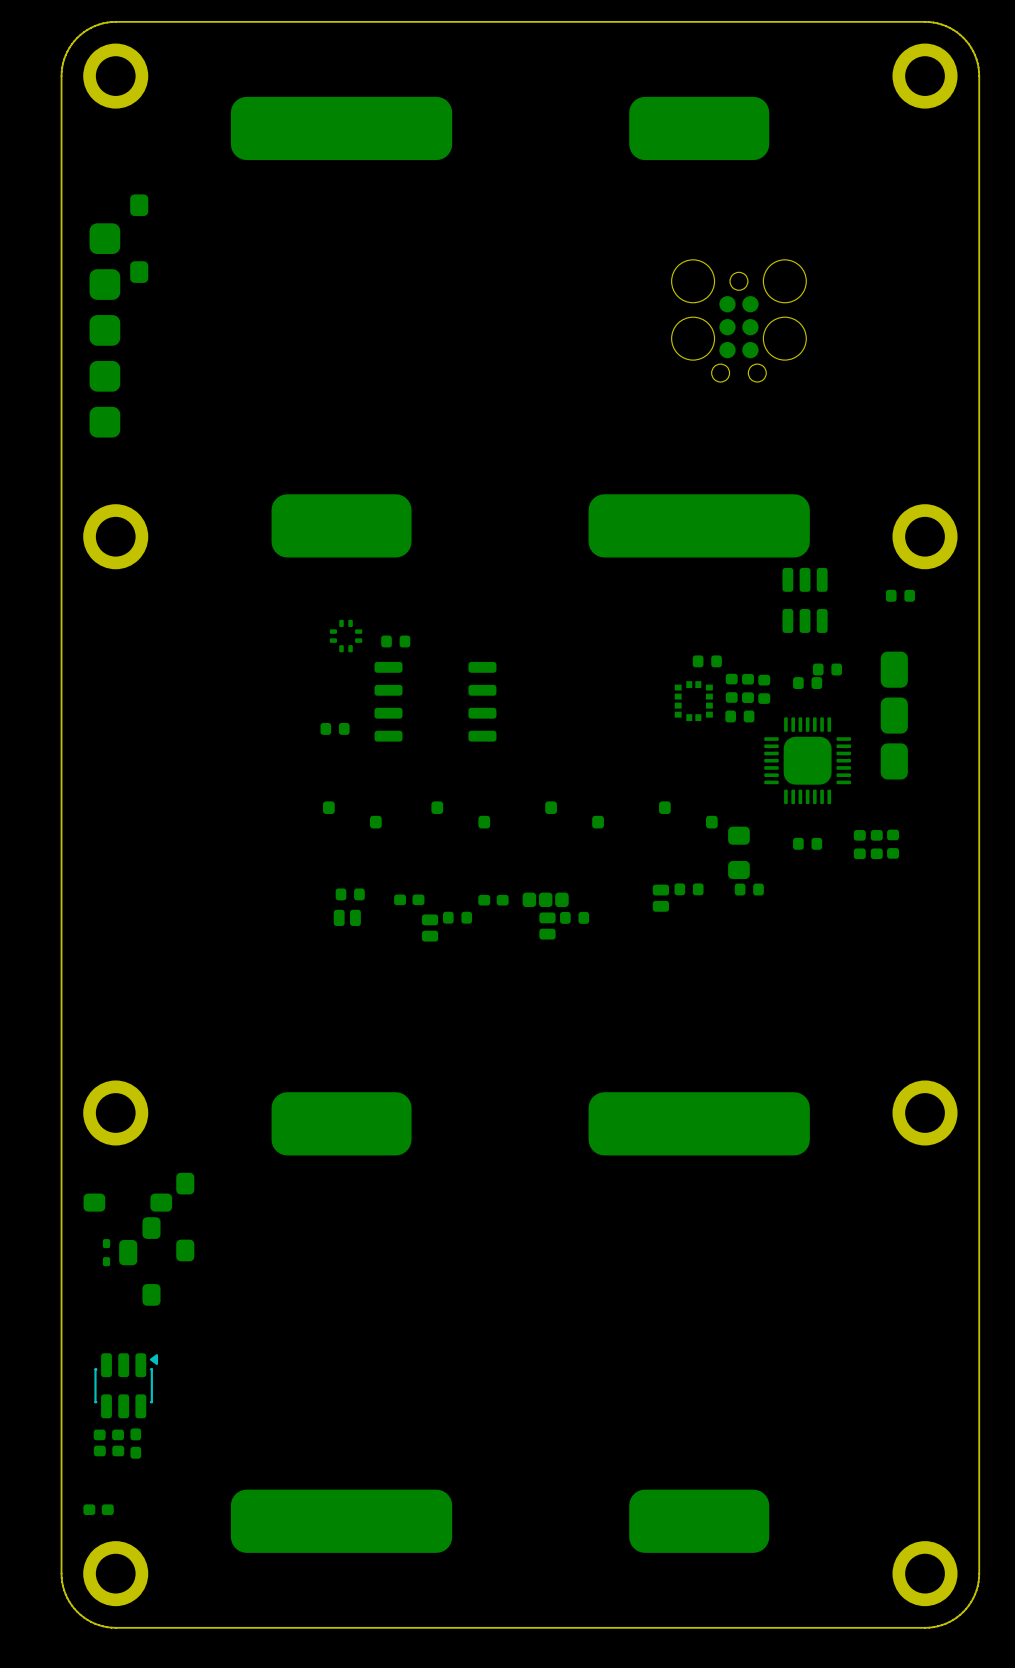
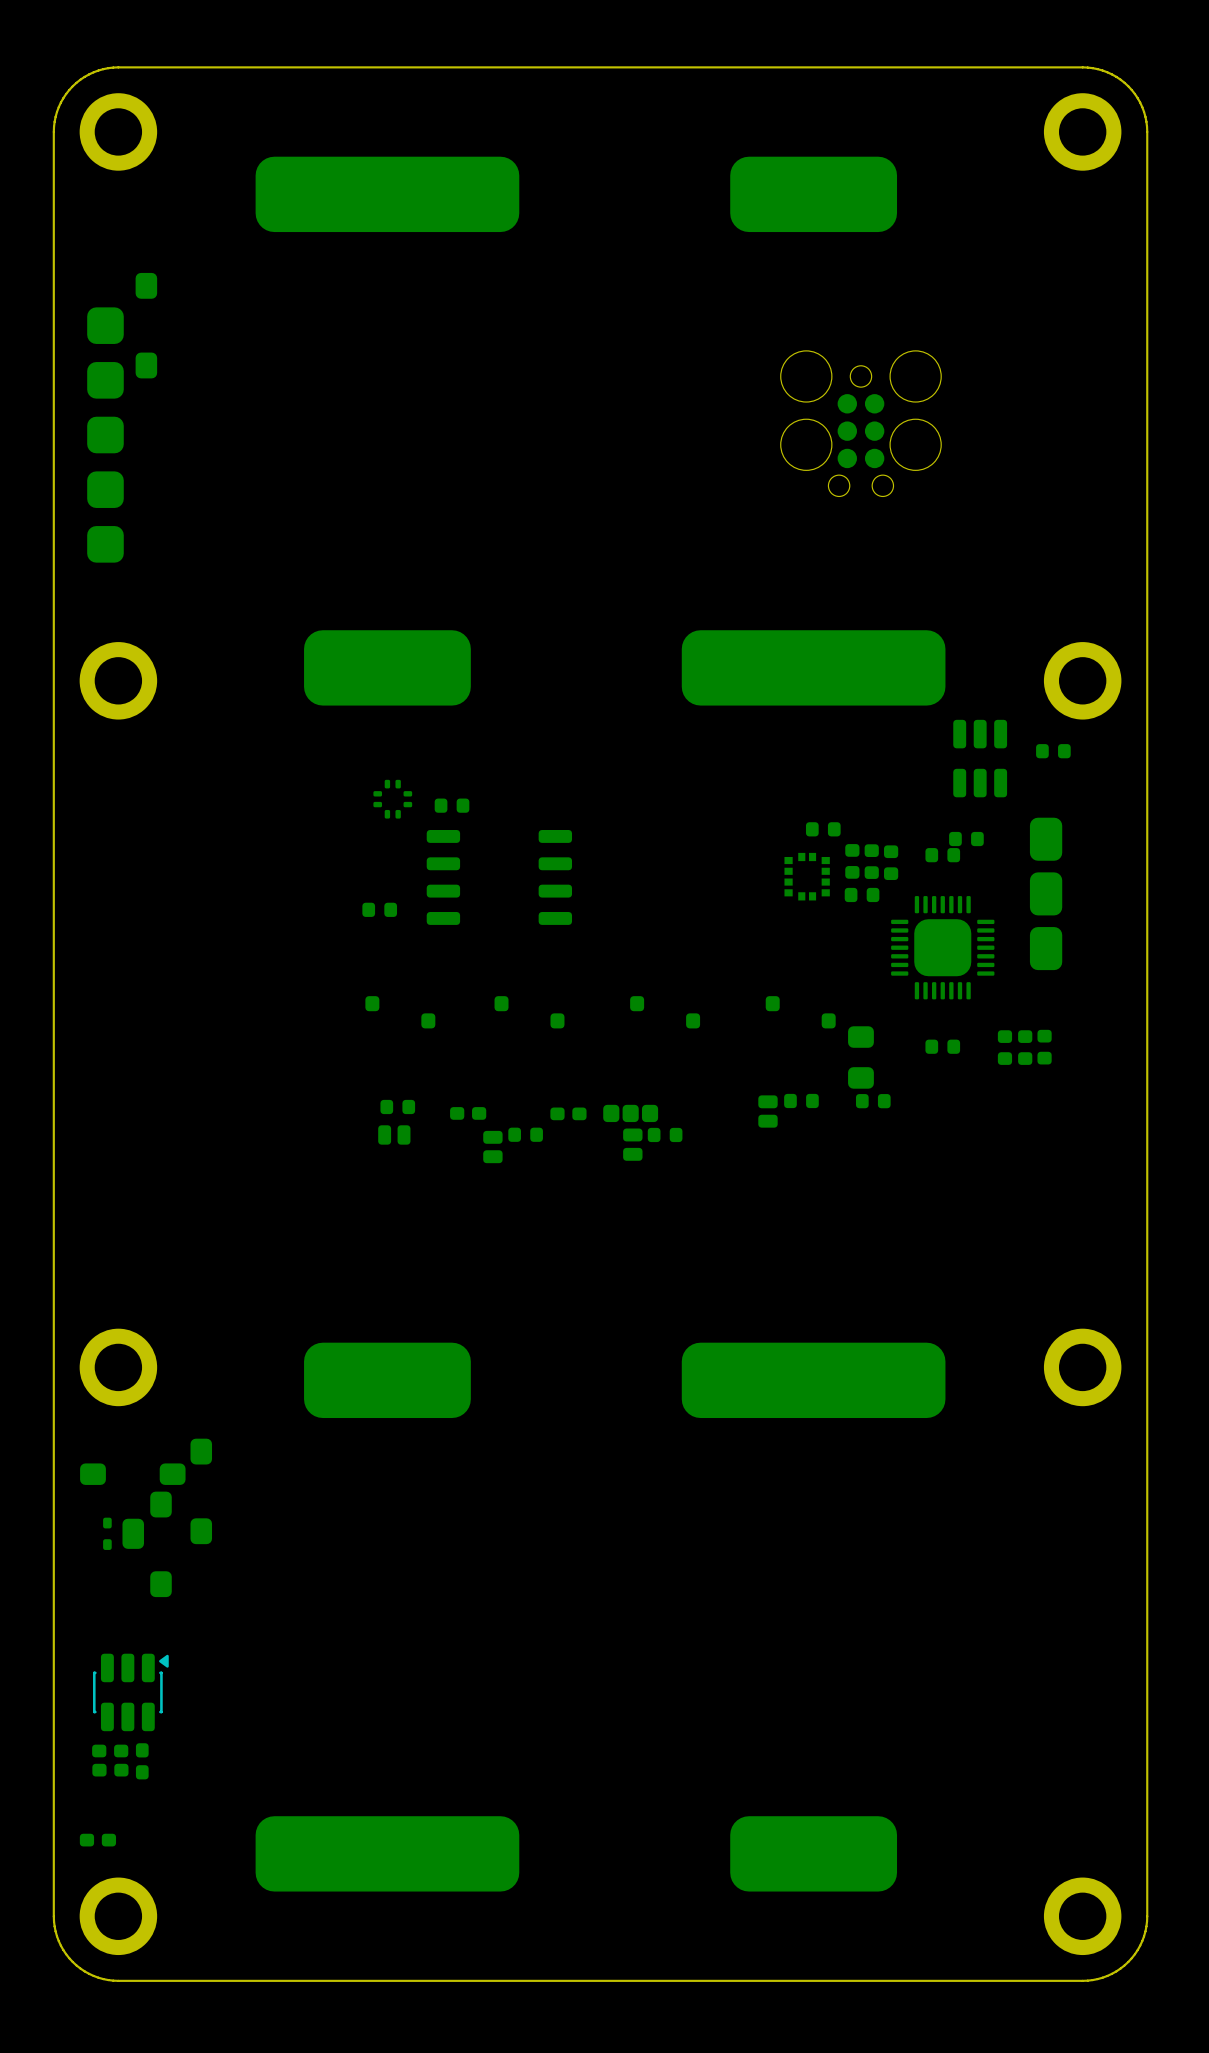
part position: (805, 600) -> (980, 758)

